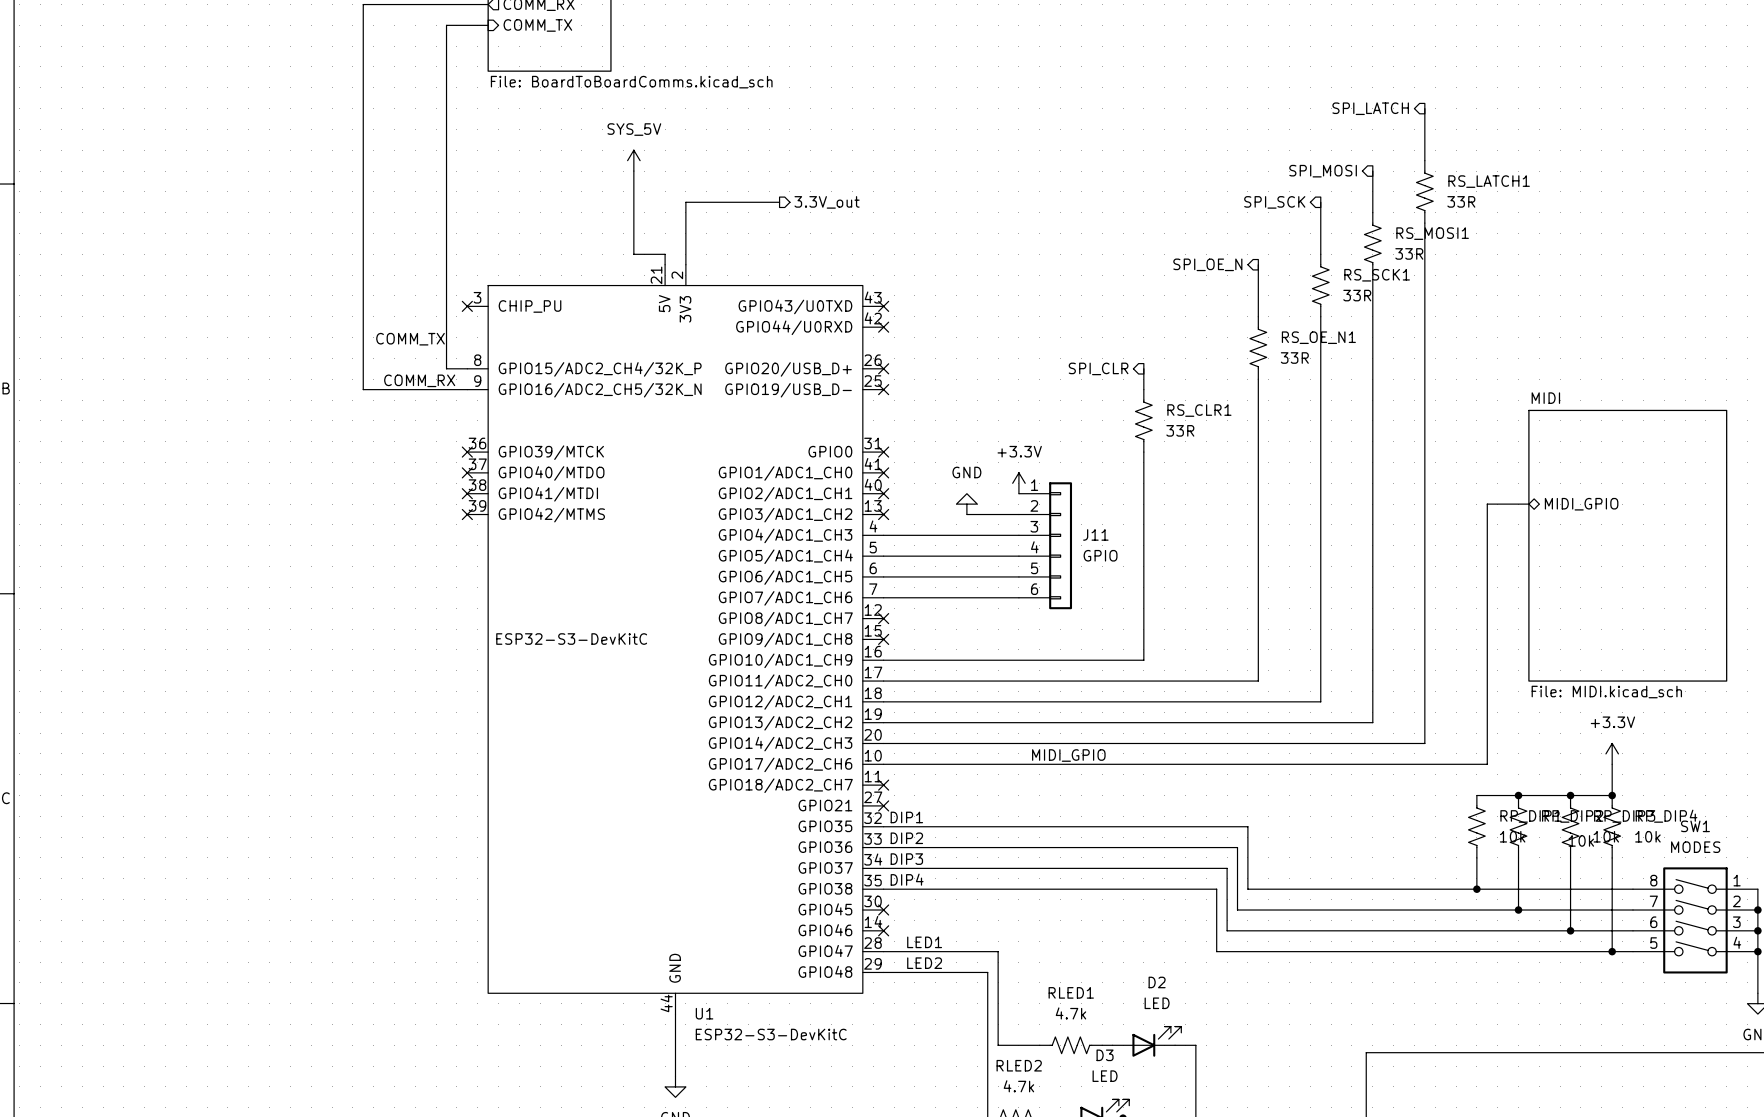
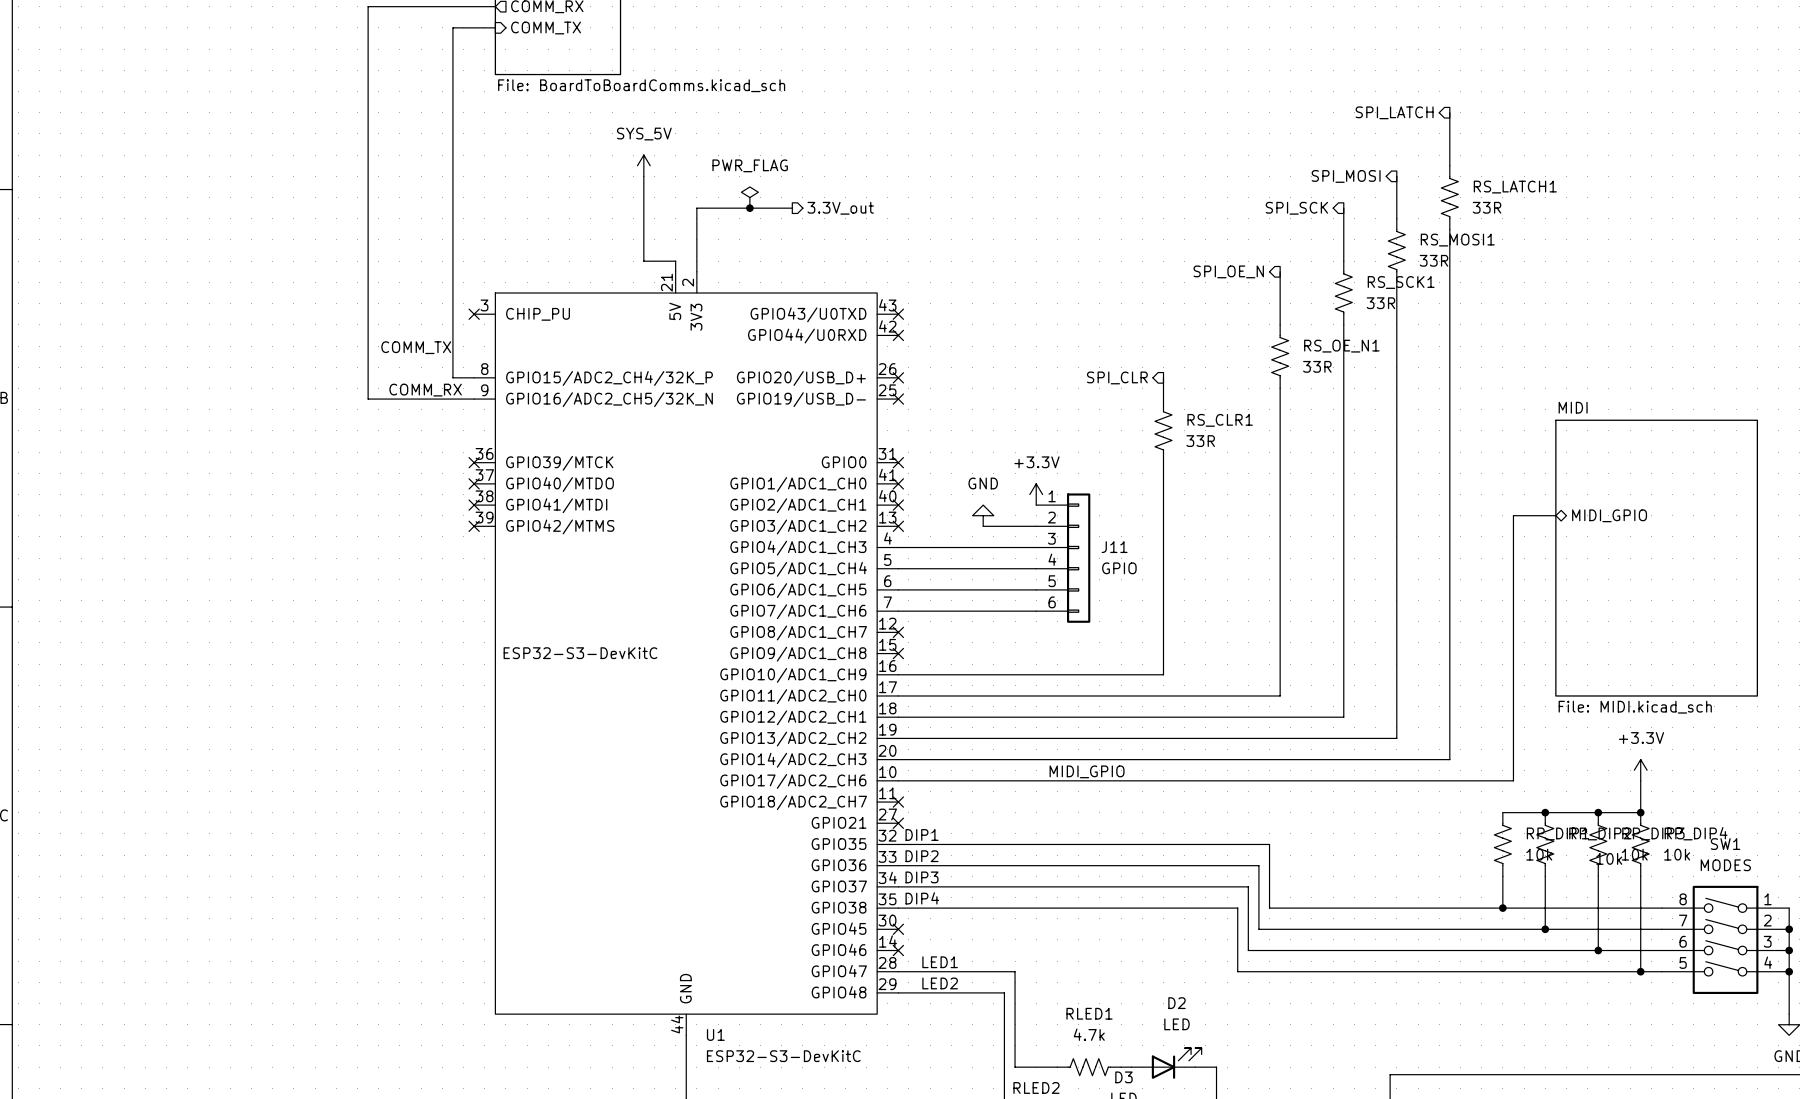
power symbol: none -> PWR_FLAG (749, 197)
junction: none -> (749, 208)

